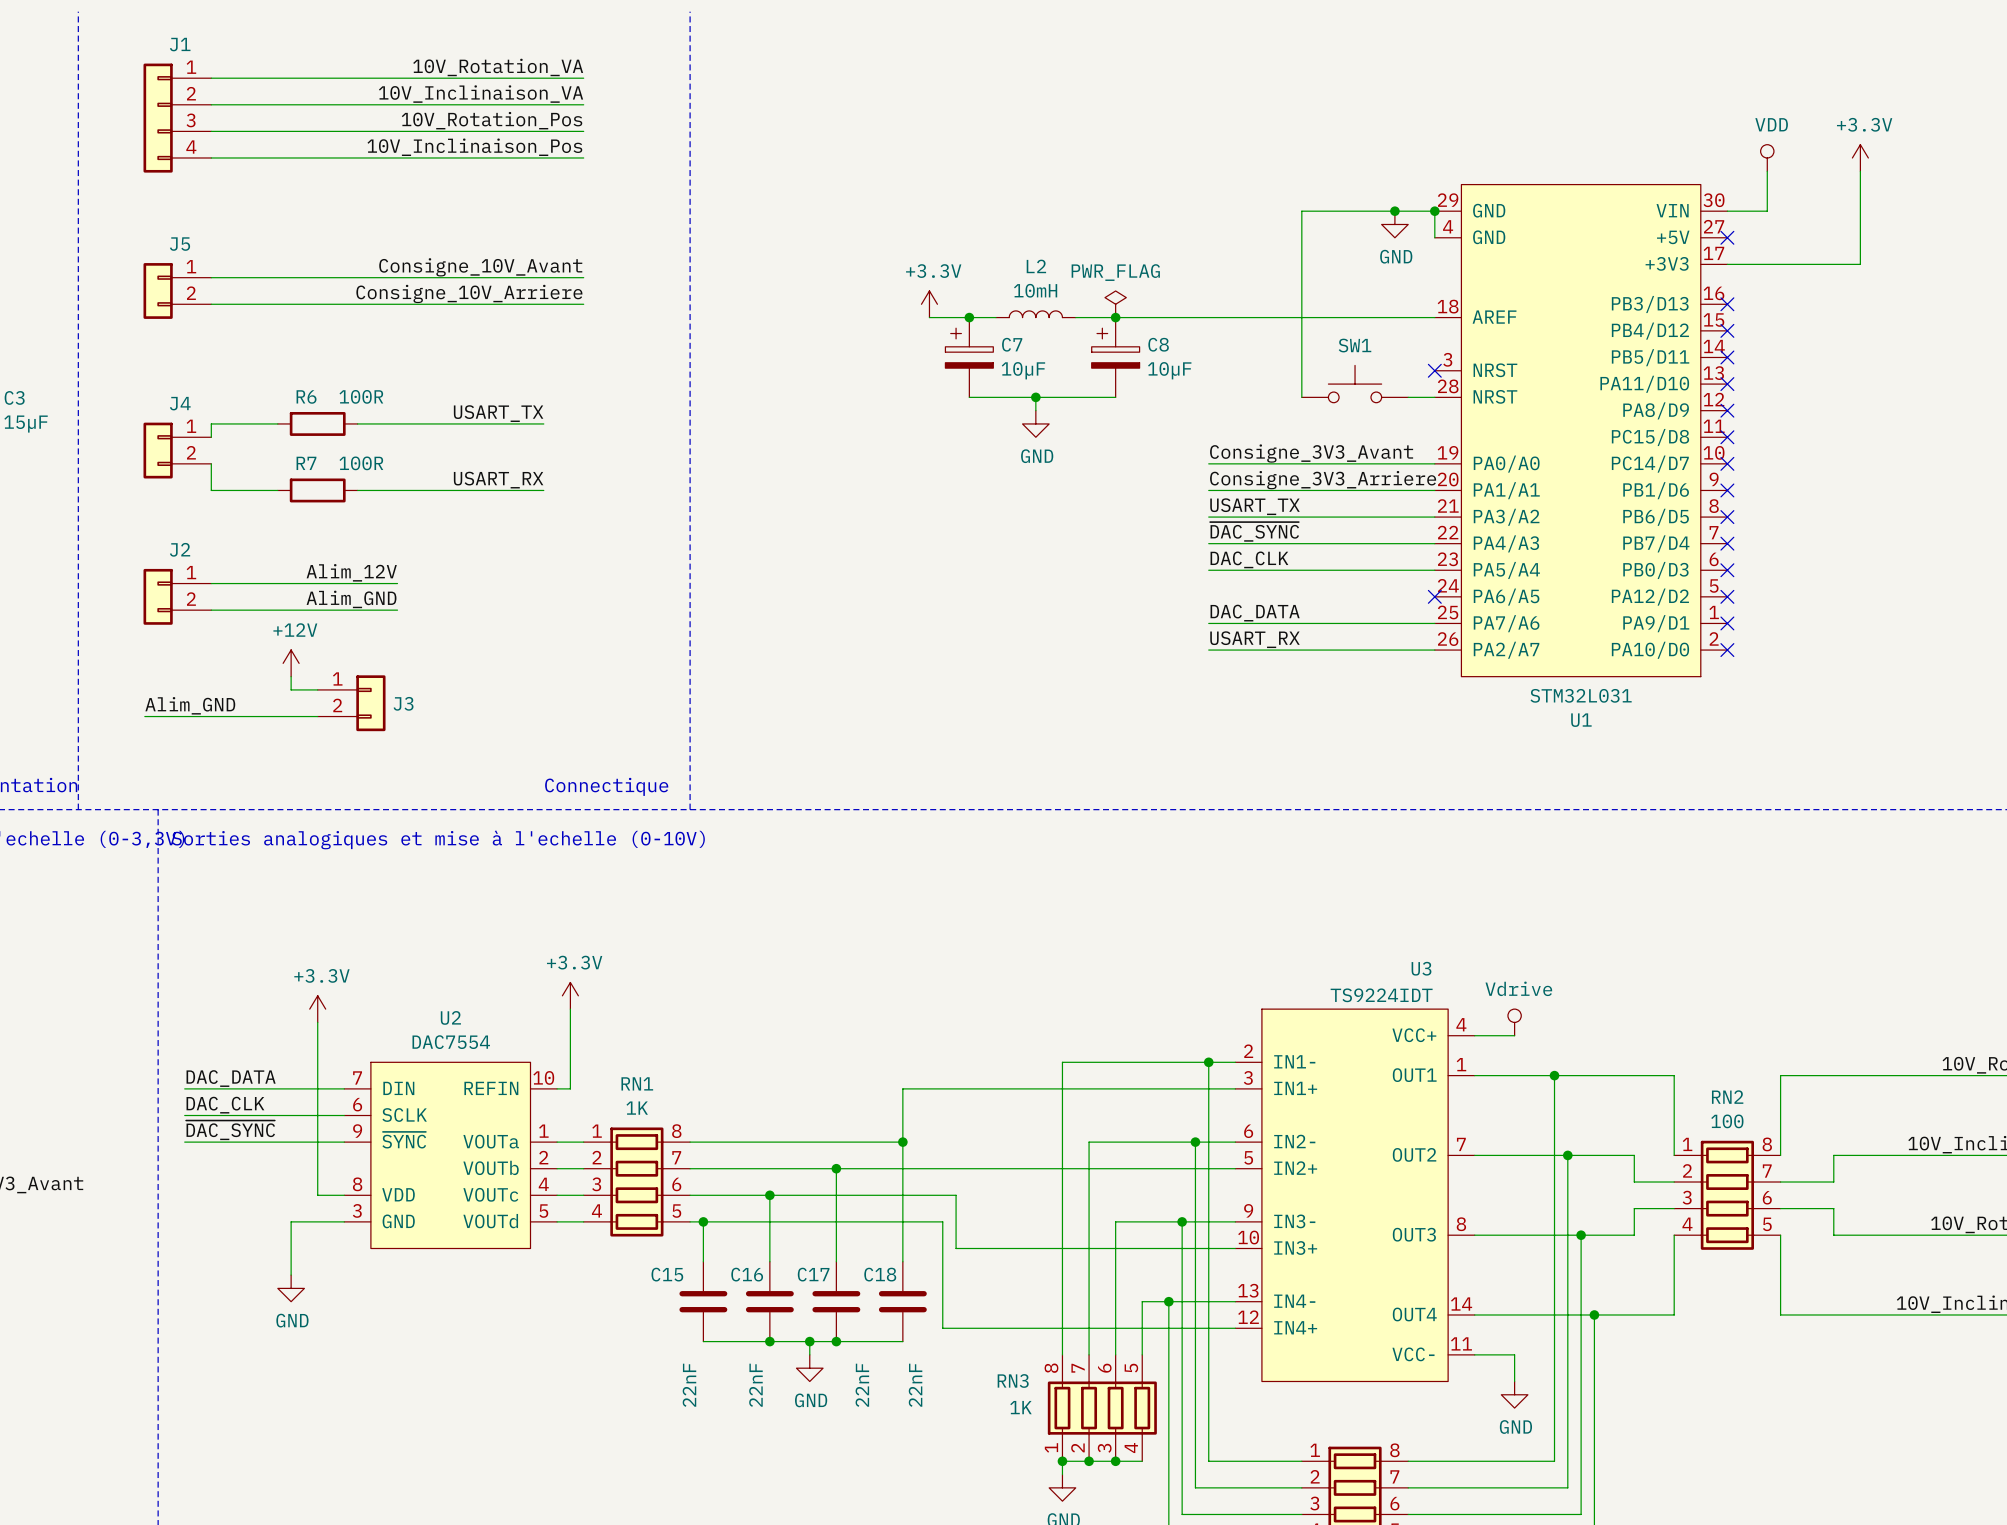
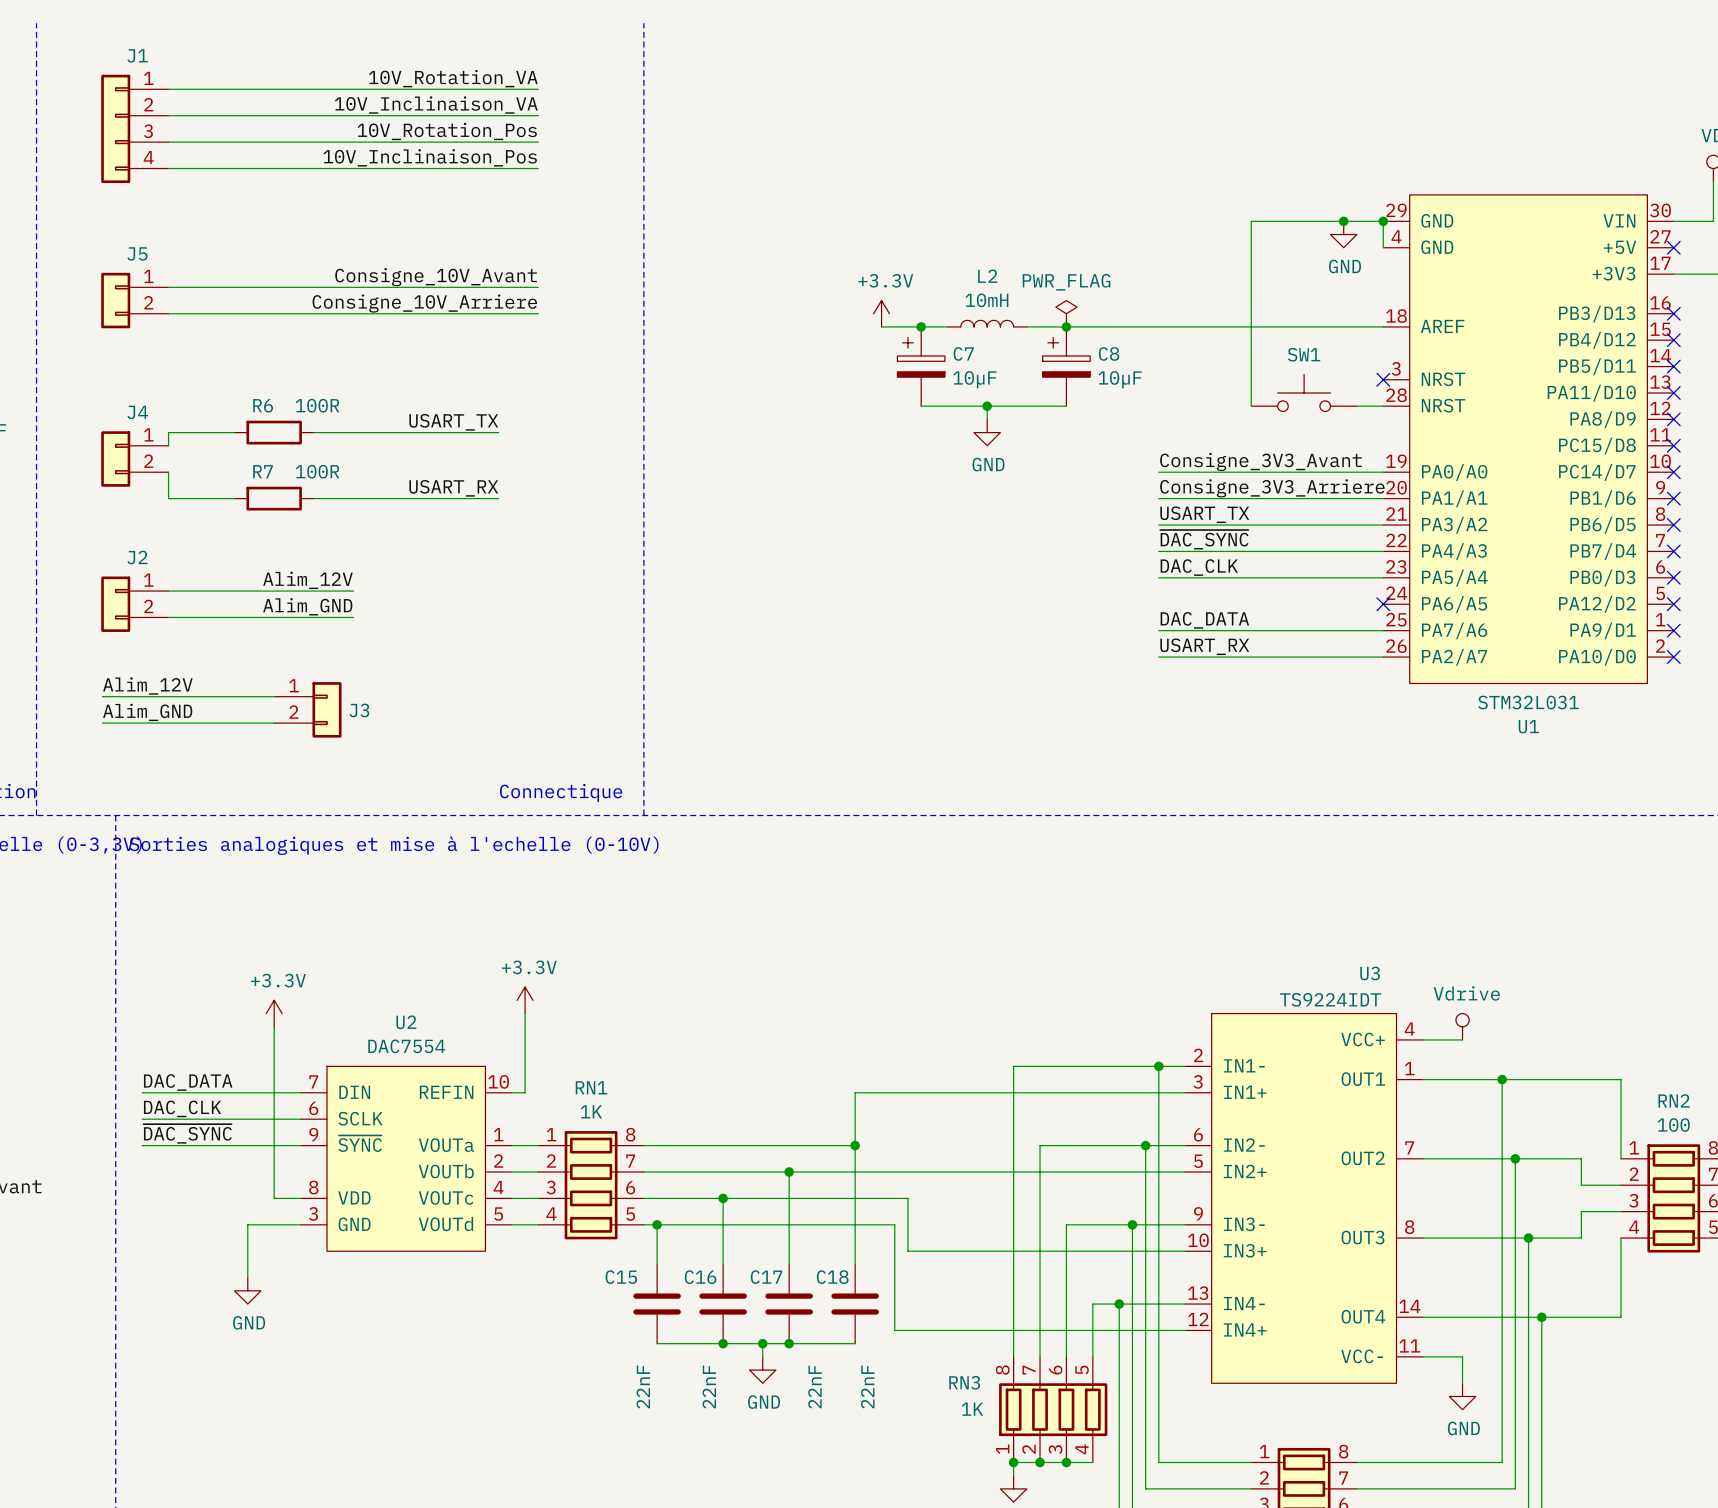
power symbol: +12V (291, 663) -> none
wire: (291, 676) (291, 689) -> (102, 696) (247, 696)
label: none -> Alim_12V (147, 686)

